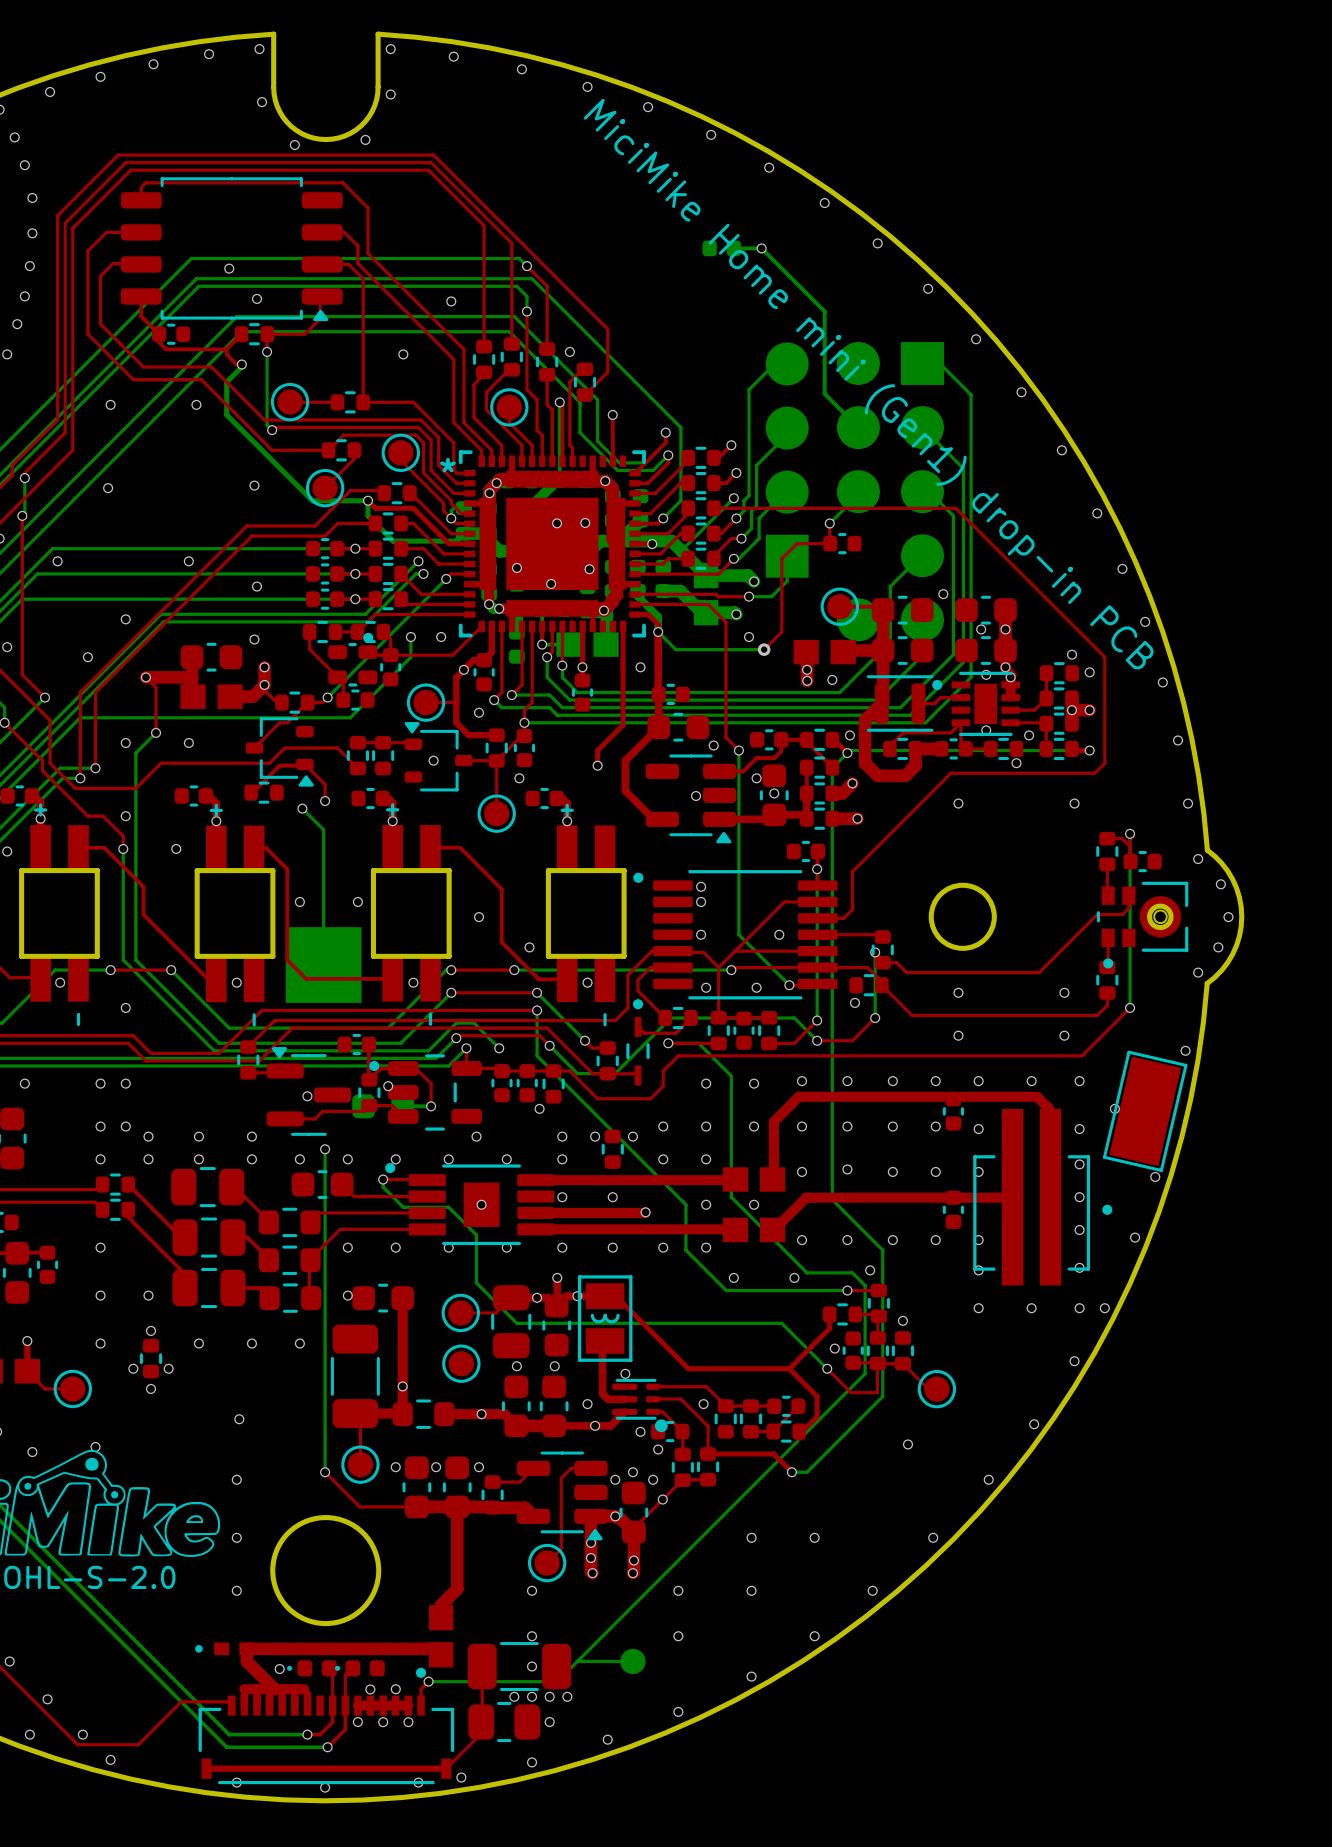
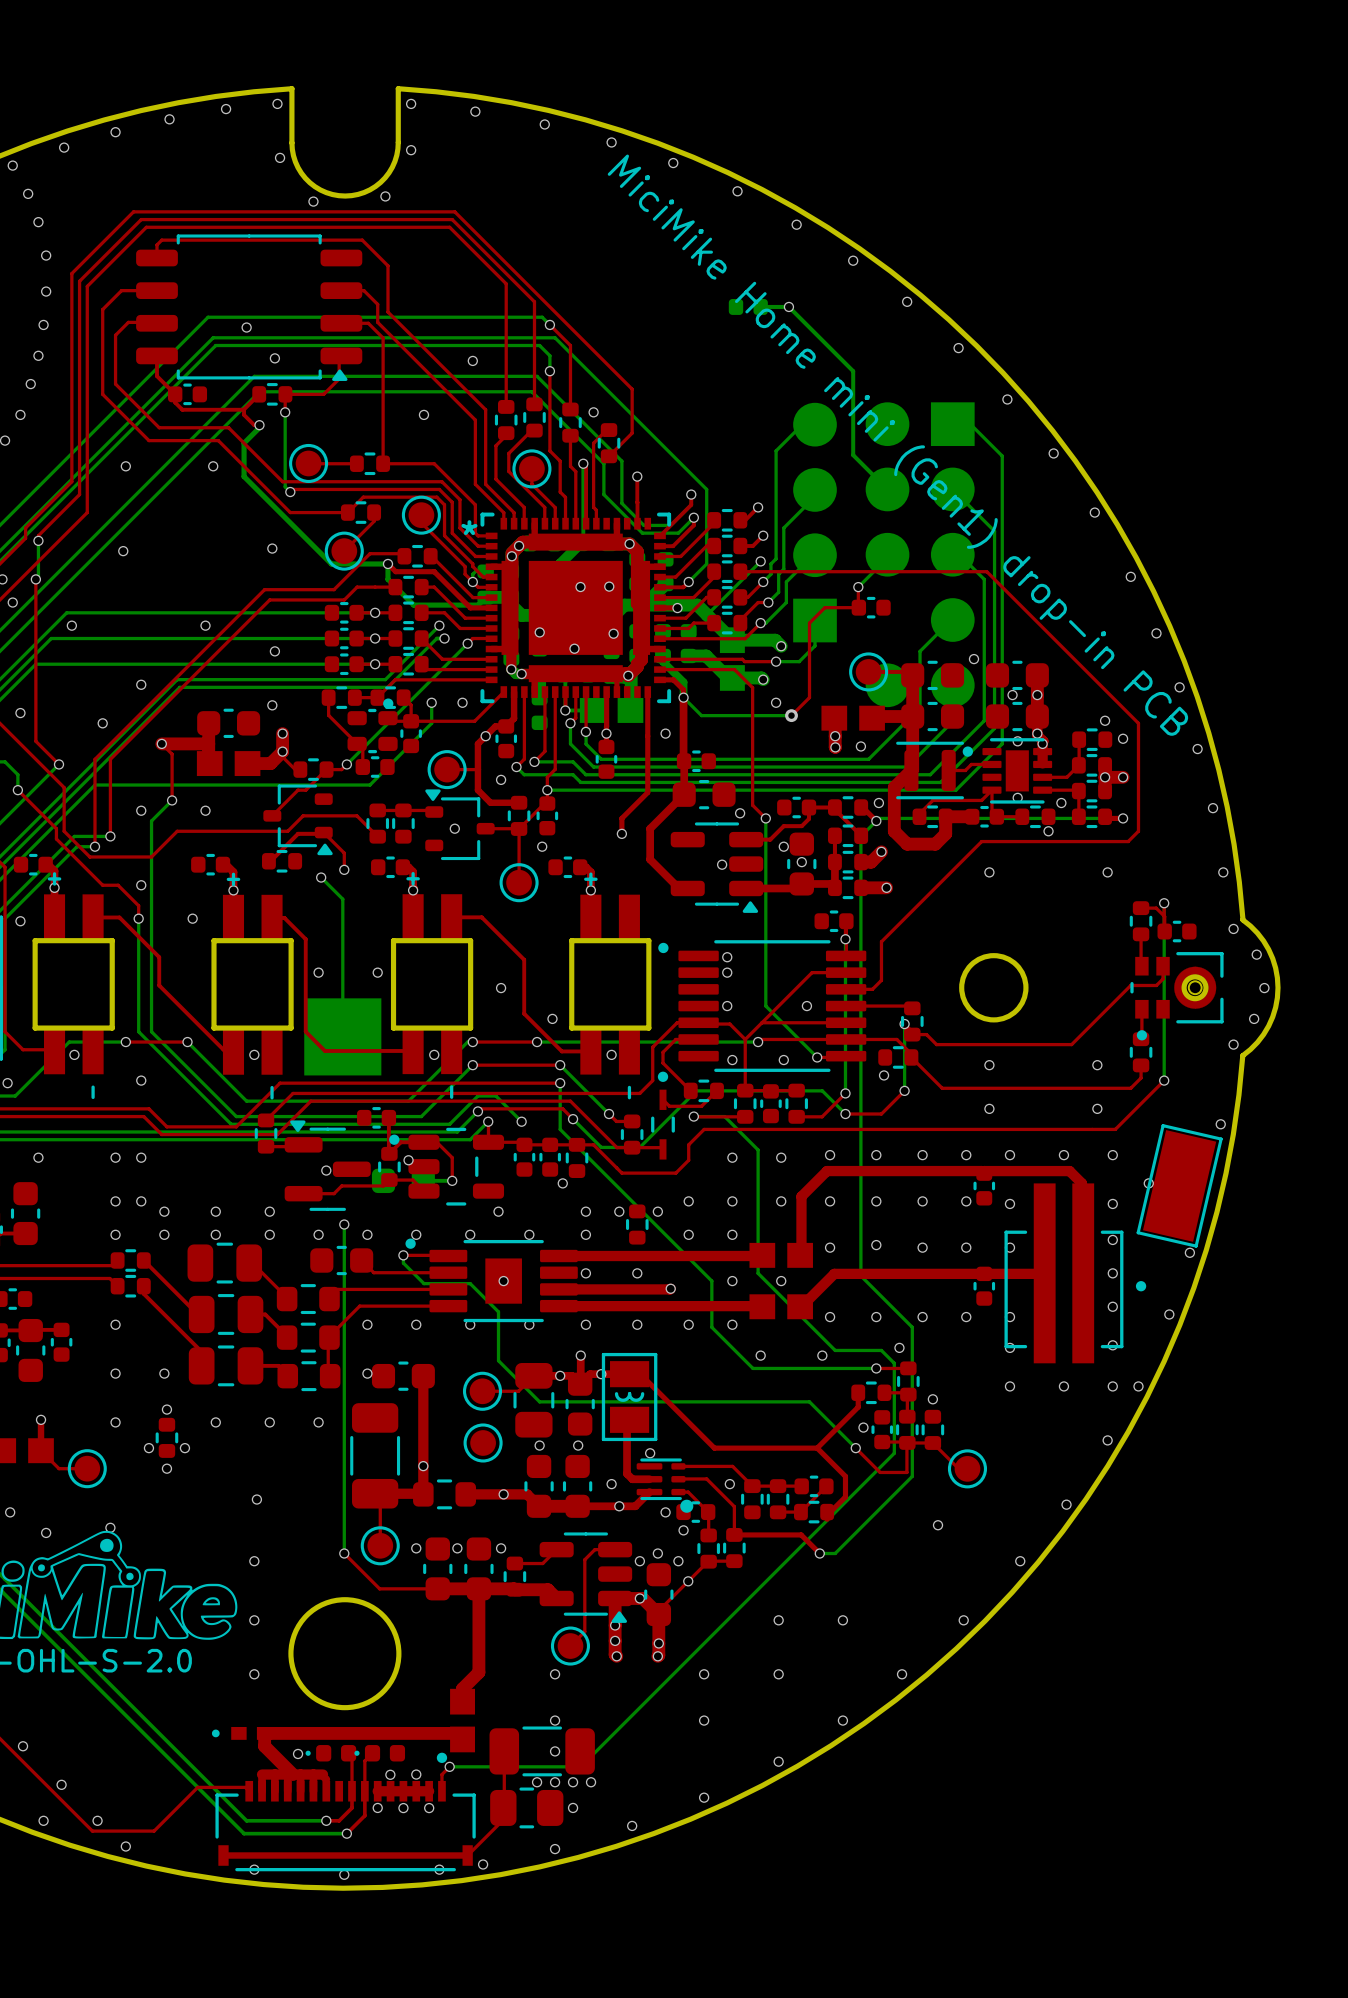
bottom track: (577, 1661) (632, 1661) -> none
part: (632, 1661) -> none

